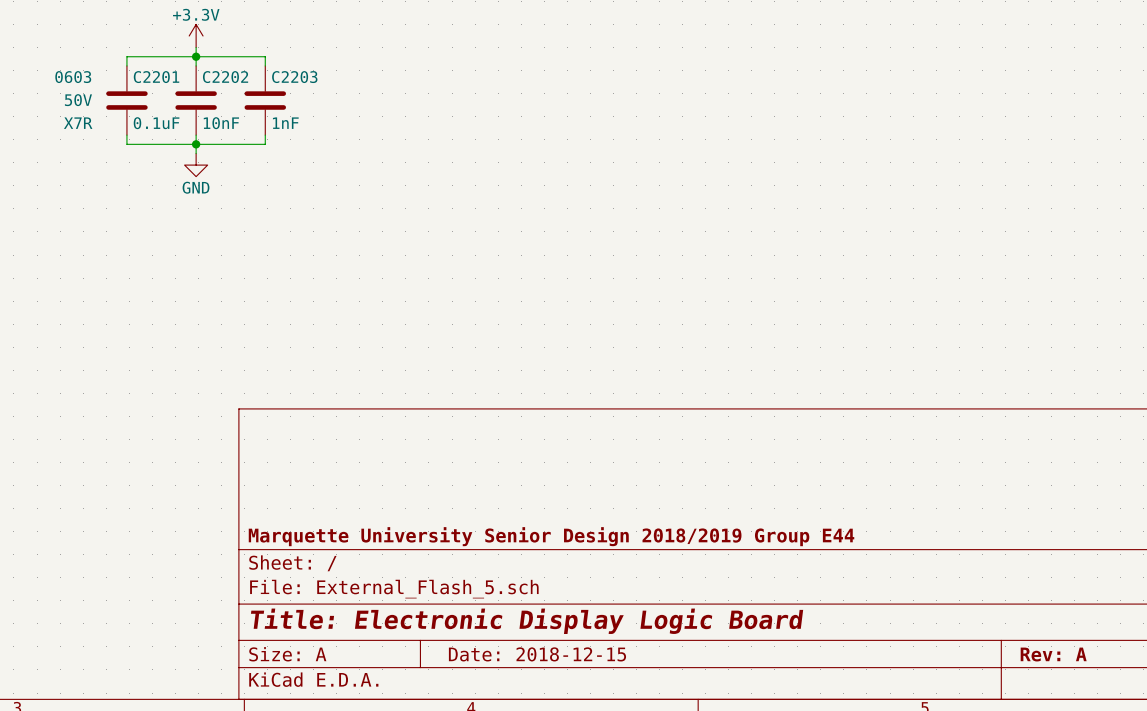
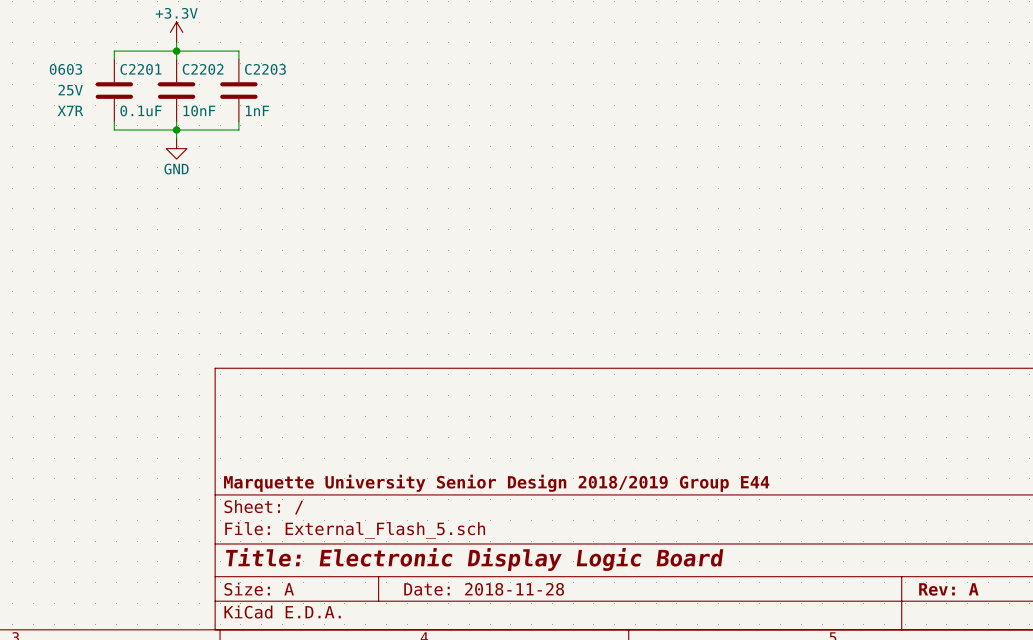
C2201 text: 50V (78, 100) -> 25V (70, 90)
title block: Date: 2018-12-15 (537, 654) -> Date: 2018-11-28 (484, 589)

